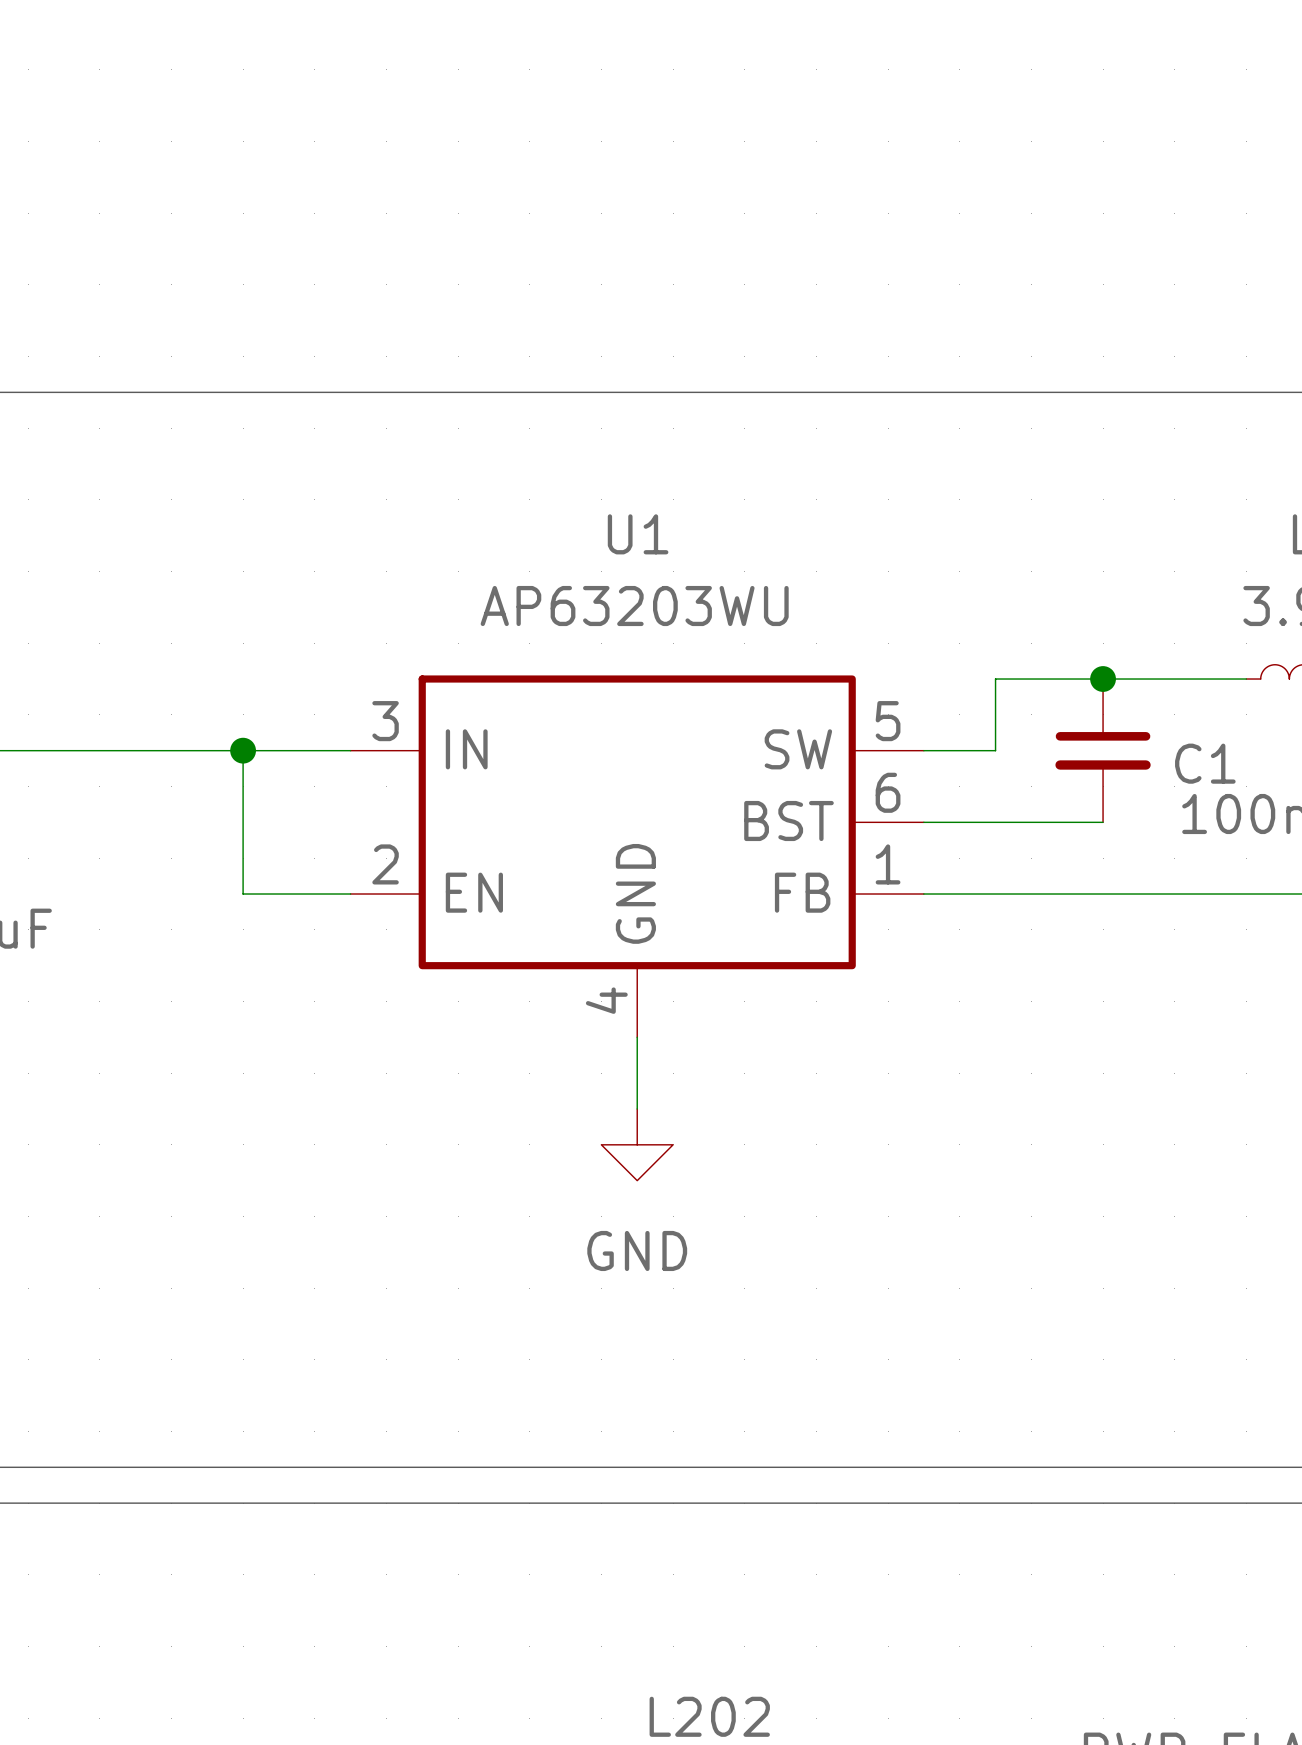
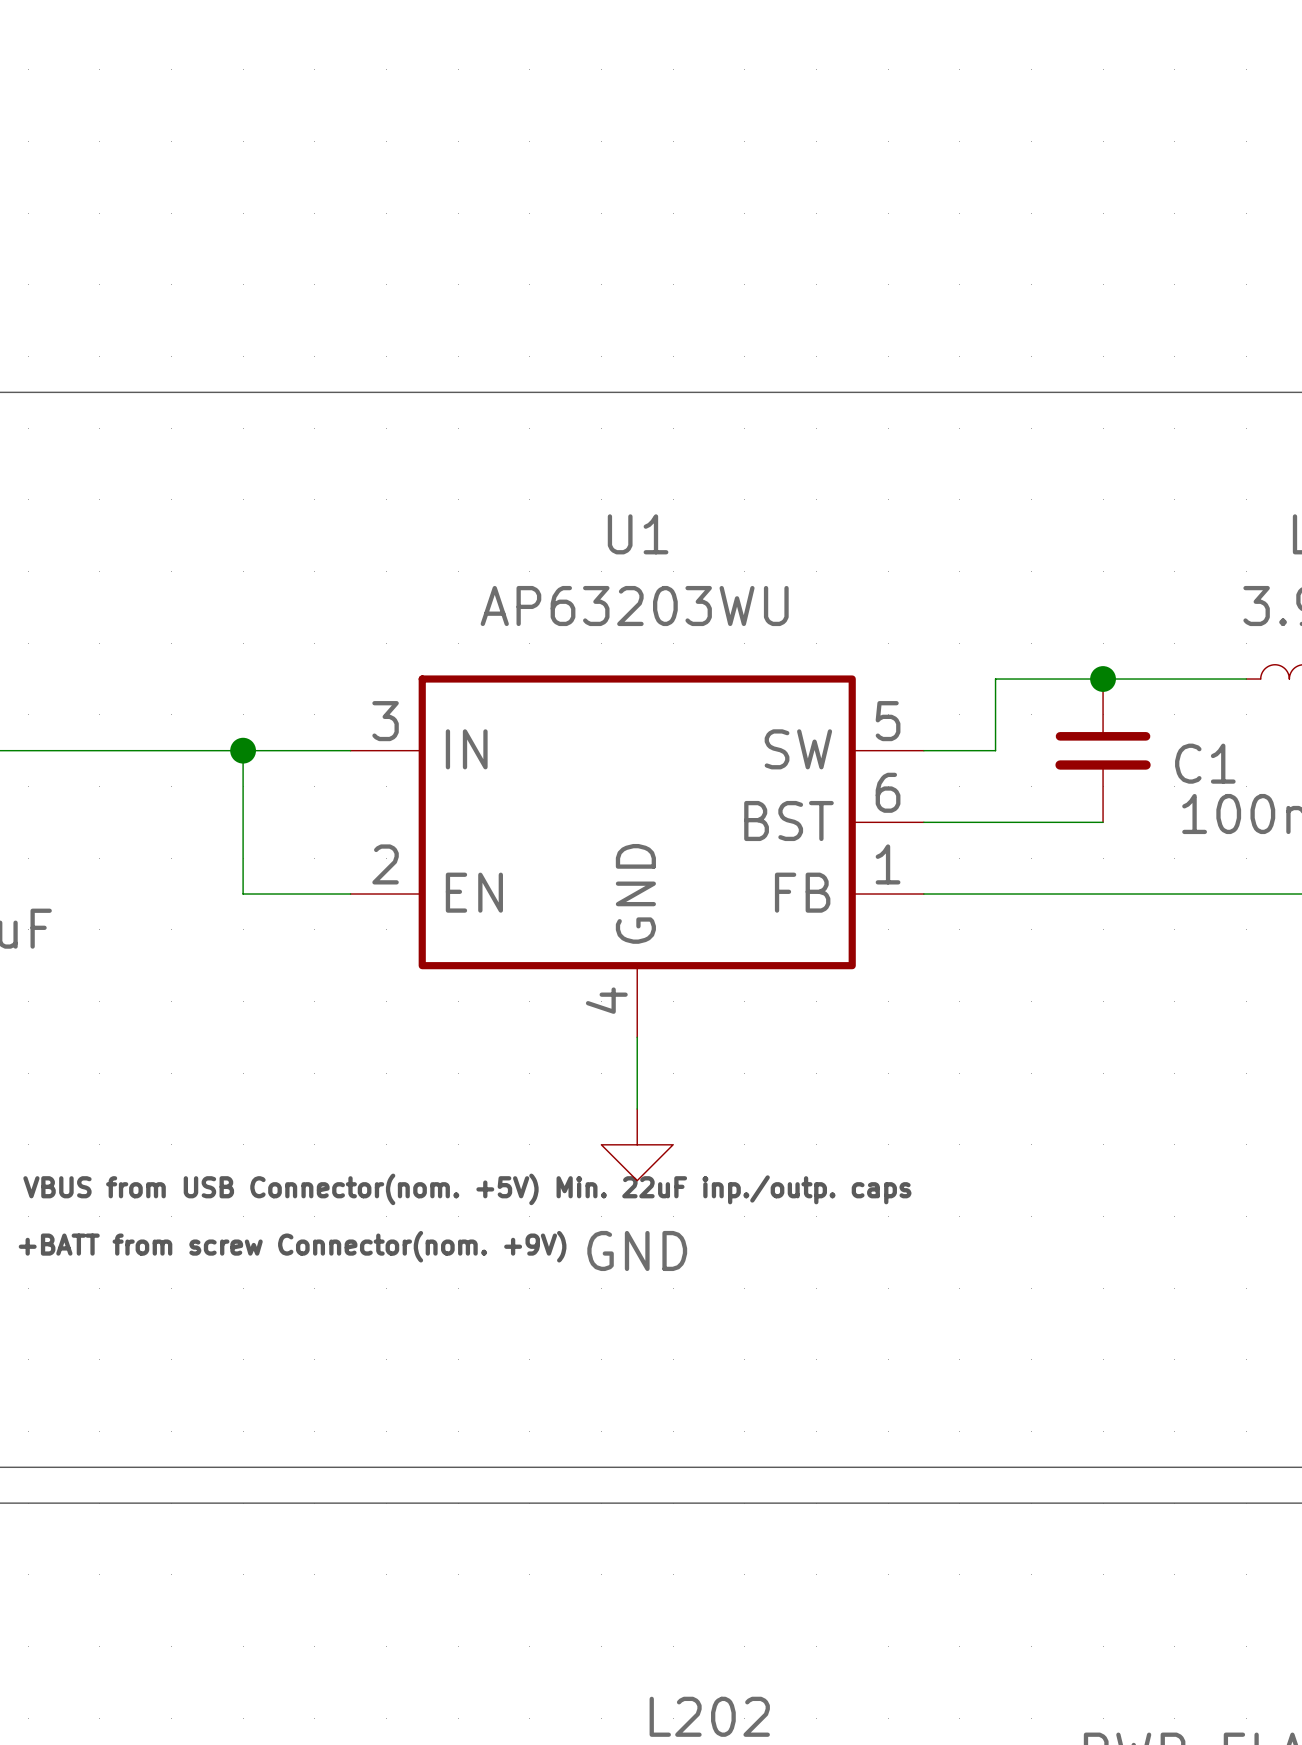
text: none -> VBUS from USB Connector(nom. +5V) Min. 22uF inp./outp. caps (467, 1189)
text: none -> +BATT from screw Connector(nom. +9V) (292, 1246)

